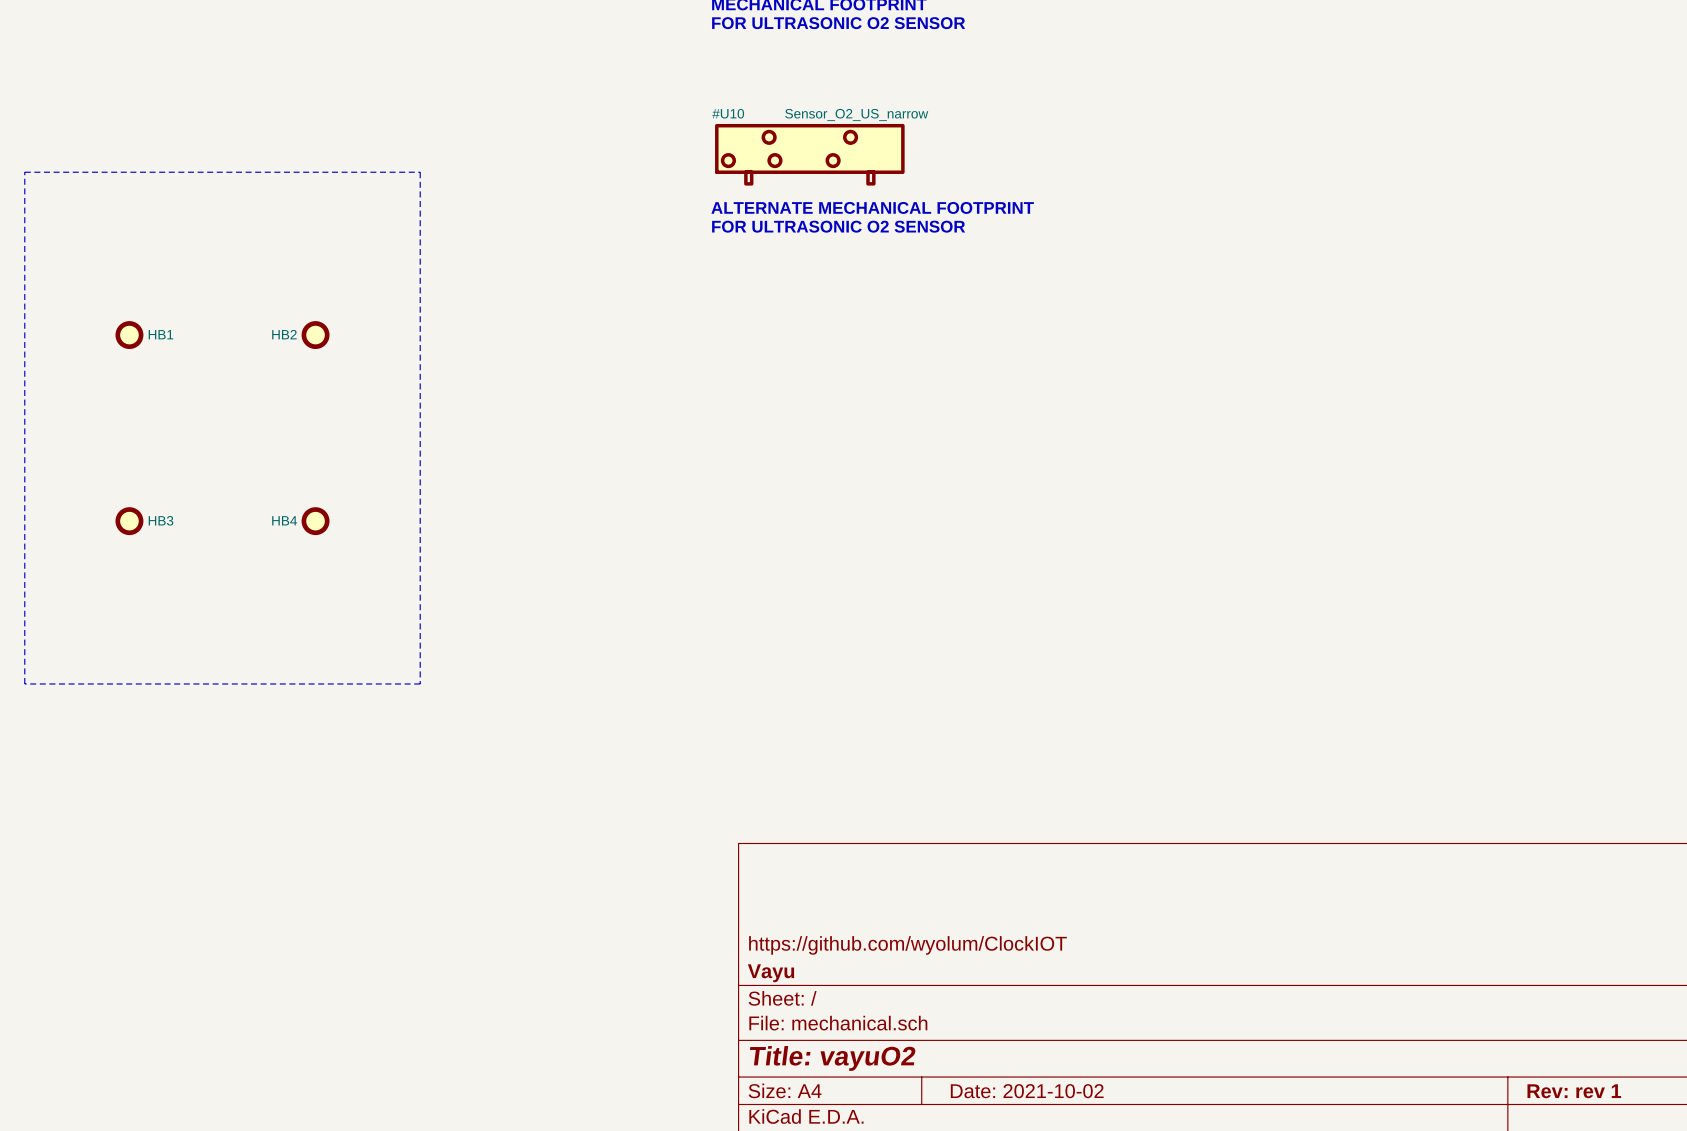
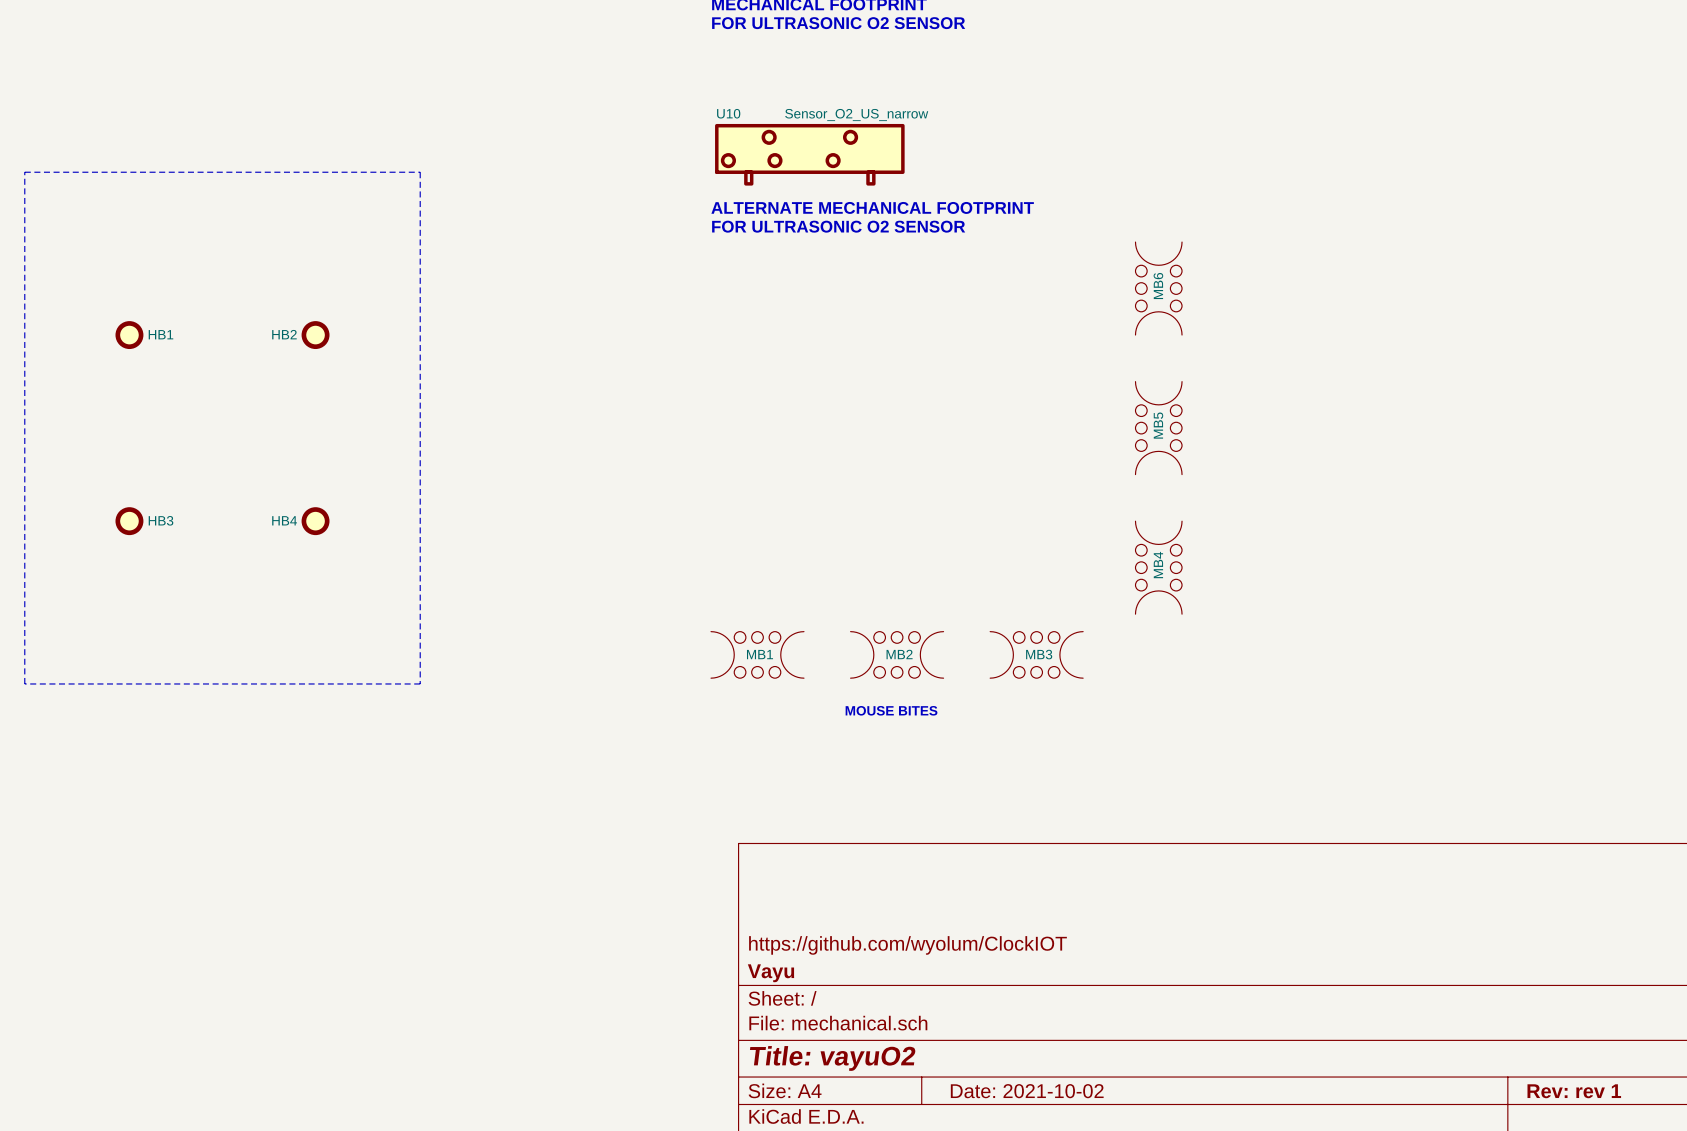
#U10: Sensor_O2_US_narrow (809, 154) -> none
U10: none -> Sensor_O2_US_narrow (809, 154)
MB6: none -> (1158, 288)
MB5: none -> (1158, 428)
MB4: none -> (1158, 567)
MB1: none -> (757, 654)
MB2: none -> (897, 654)
MB3: none -> (1036, 654)
text: none -> MOUSE BITES (891, 710)

